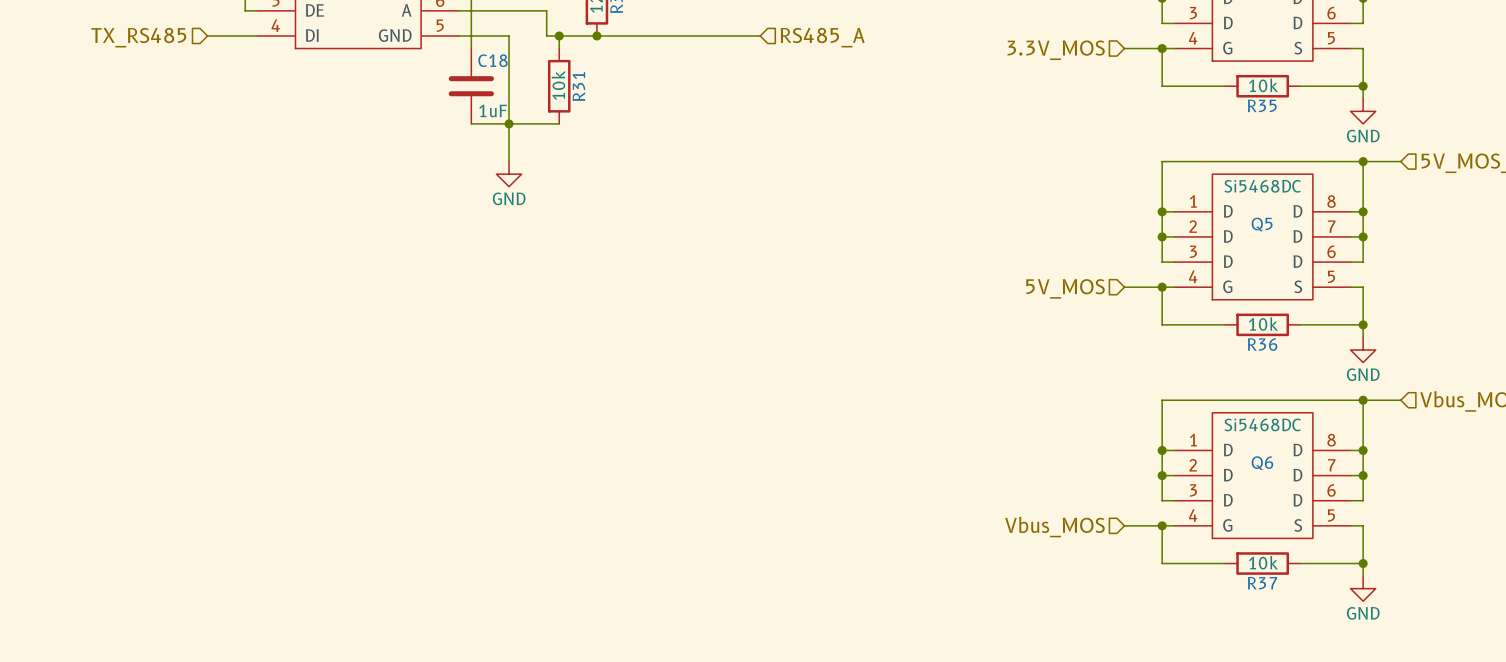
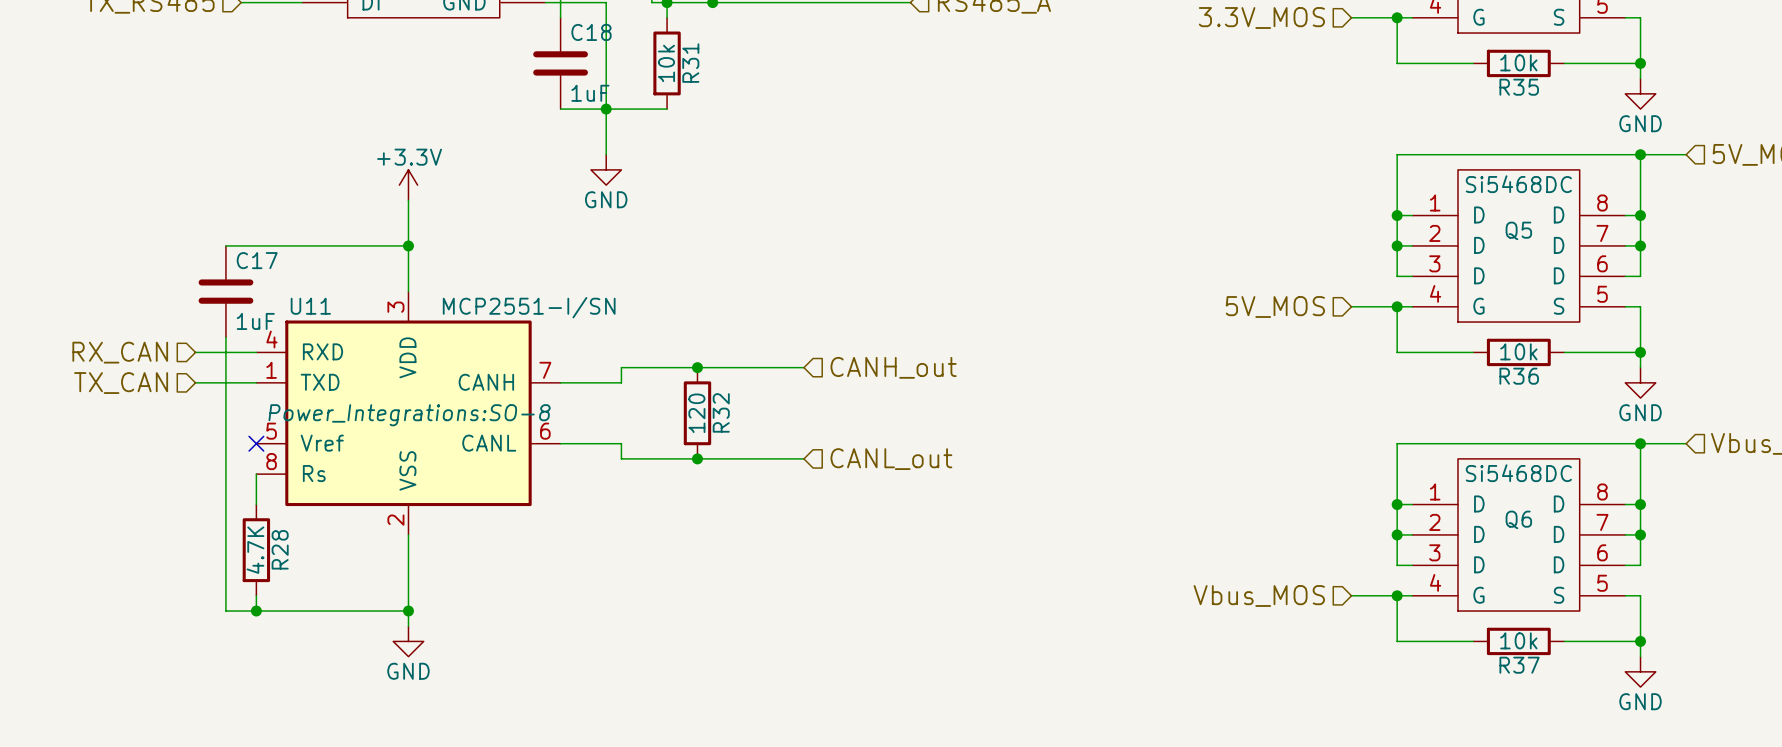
power symbol: none -> +3.3V (408, 185)
wire: none -> (408, 200) (408, 291)
wire: none -> (225, 245) (408, 245)
junction: none -> (408, 245)
C17: none -> 1uF (225, 291)
wire: none -> (225, 337) (225, 611) (408, 611)
wire: none -> (195, 352) (256, 352)
hierarchical label: none -> RX_CAN (120, 352)
junction: none -> (697, 367)
wire: none -> (803, 367) (621, 367) (621, 382) (560, 382)
hierarchical label: none -> CANH_out (893, 367)
wire: none -> (195, 382) (256, 382)
hierarchical label: none -> TX_CAN (121, 383)
U11: none -> MCP2551-I/SN (408, 413)
R32: none -> 120 (697, 413)
no-connect mark: none -> (256, 443)
wire: none -> (560, 443) (621, 443) (621, 458) (803, 458)
junction: none -> (697, 458)
hierarchical label: none -> CANL_out (891, 459)
wire: none -> (256, 474) (256, 504)
wire: none -> (408, 534) (408, 626)
R28: none -> 4.7K (256, 550)
wire: none -> (256, 595) (256, 611)
junction: none -> (256, 611)
junction: none -> (408, 611)
power symbol: none -> GND (408, 641)

